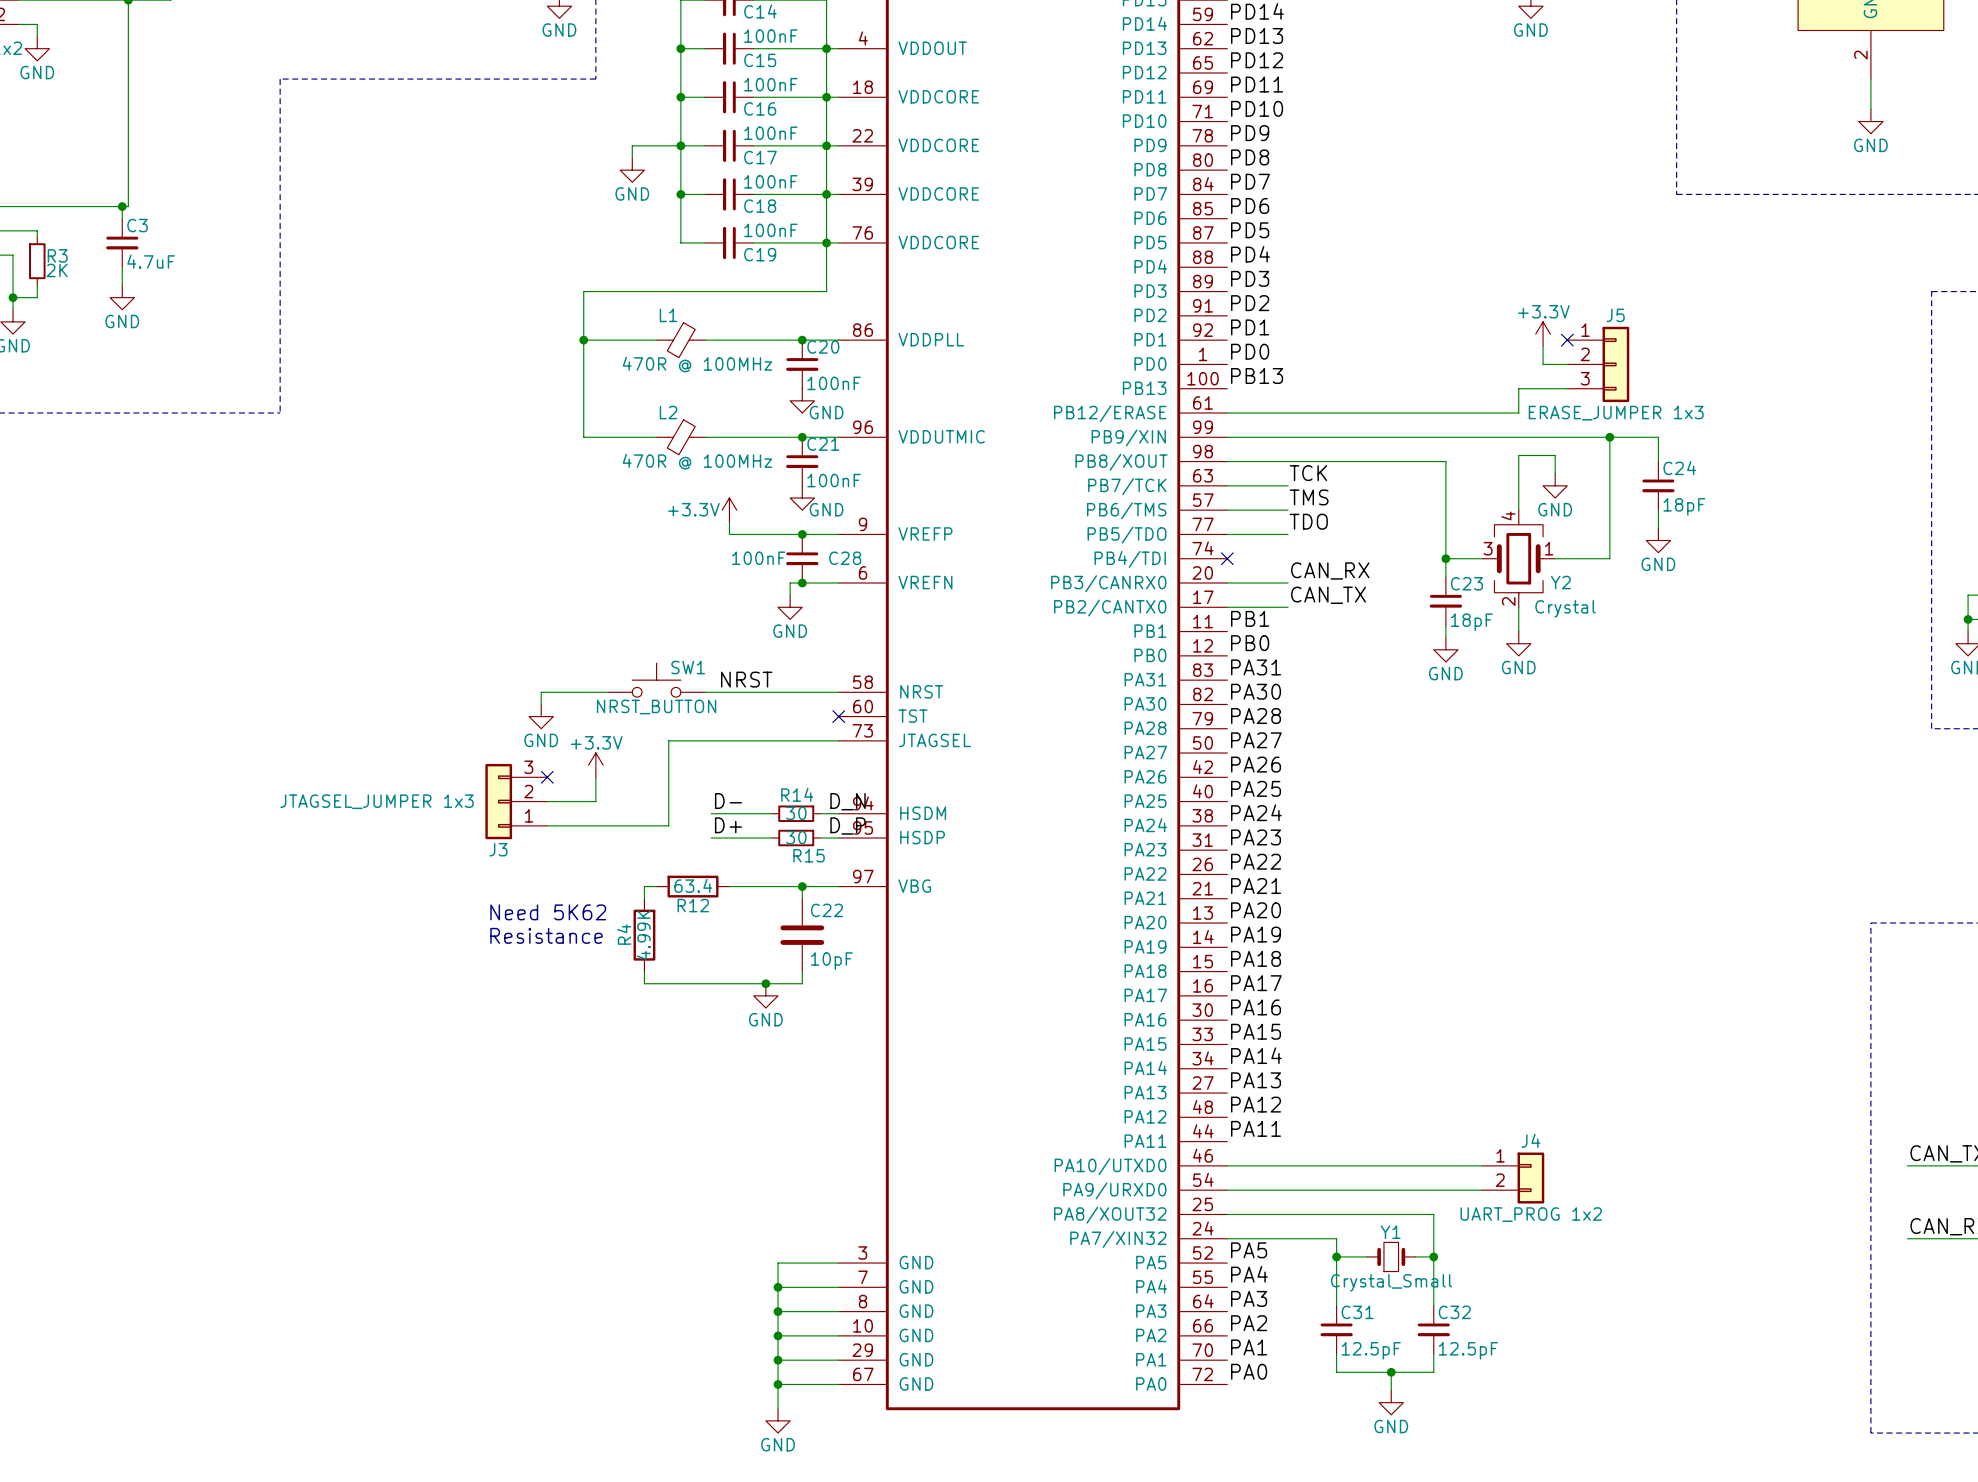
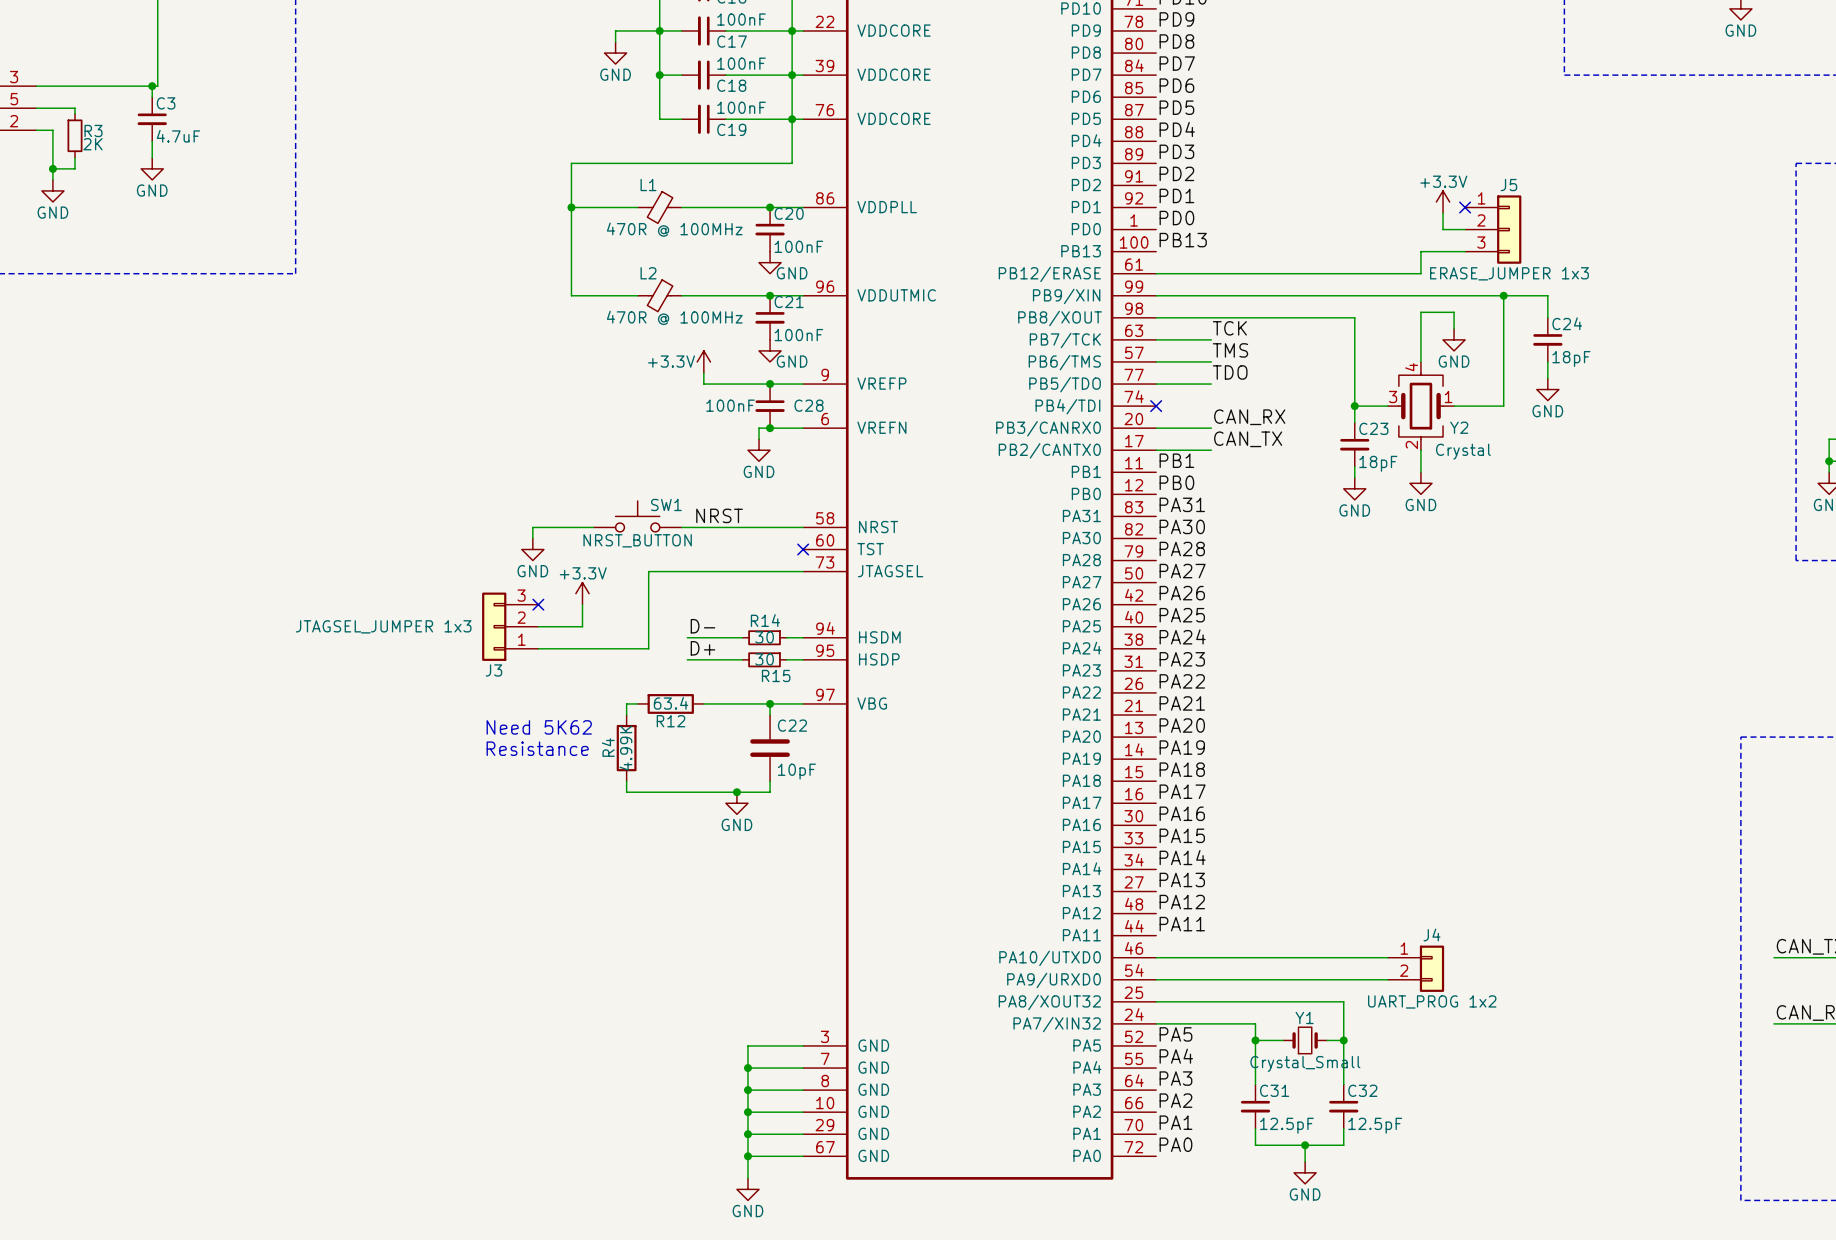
label: D_N (848, 801) -> none
label: D_P (848, 826) -> none

